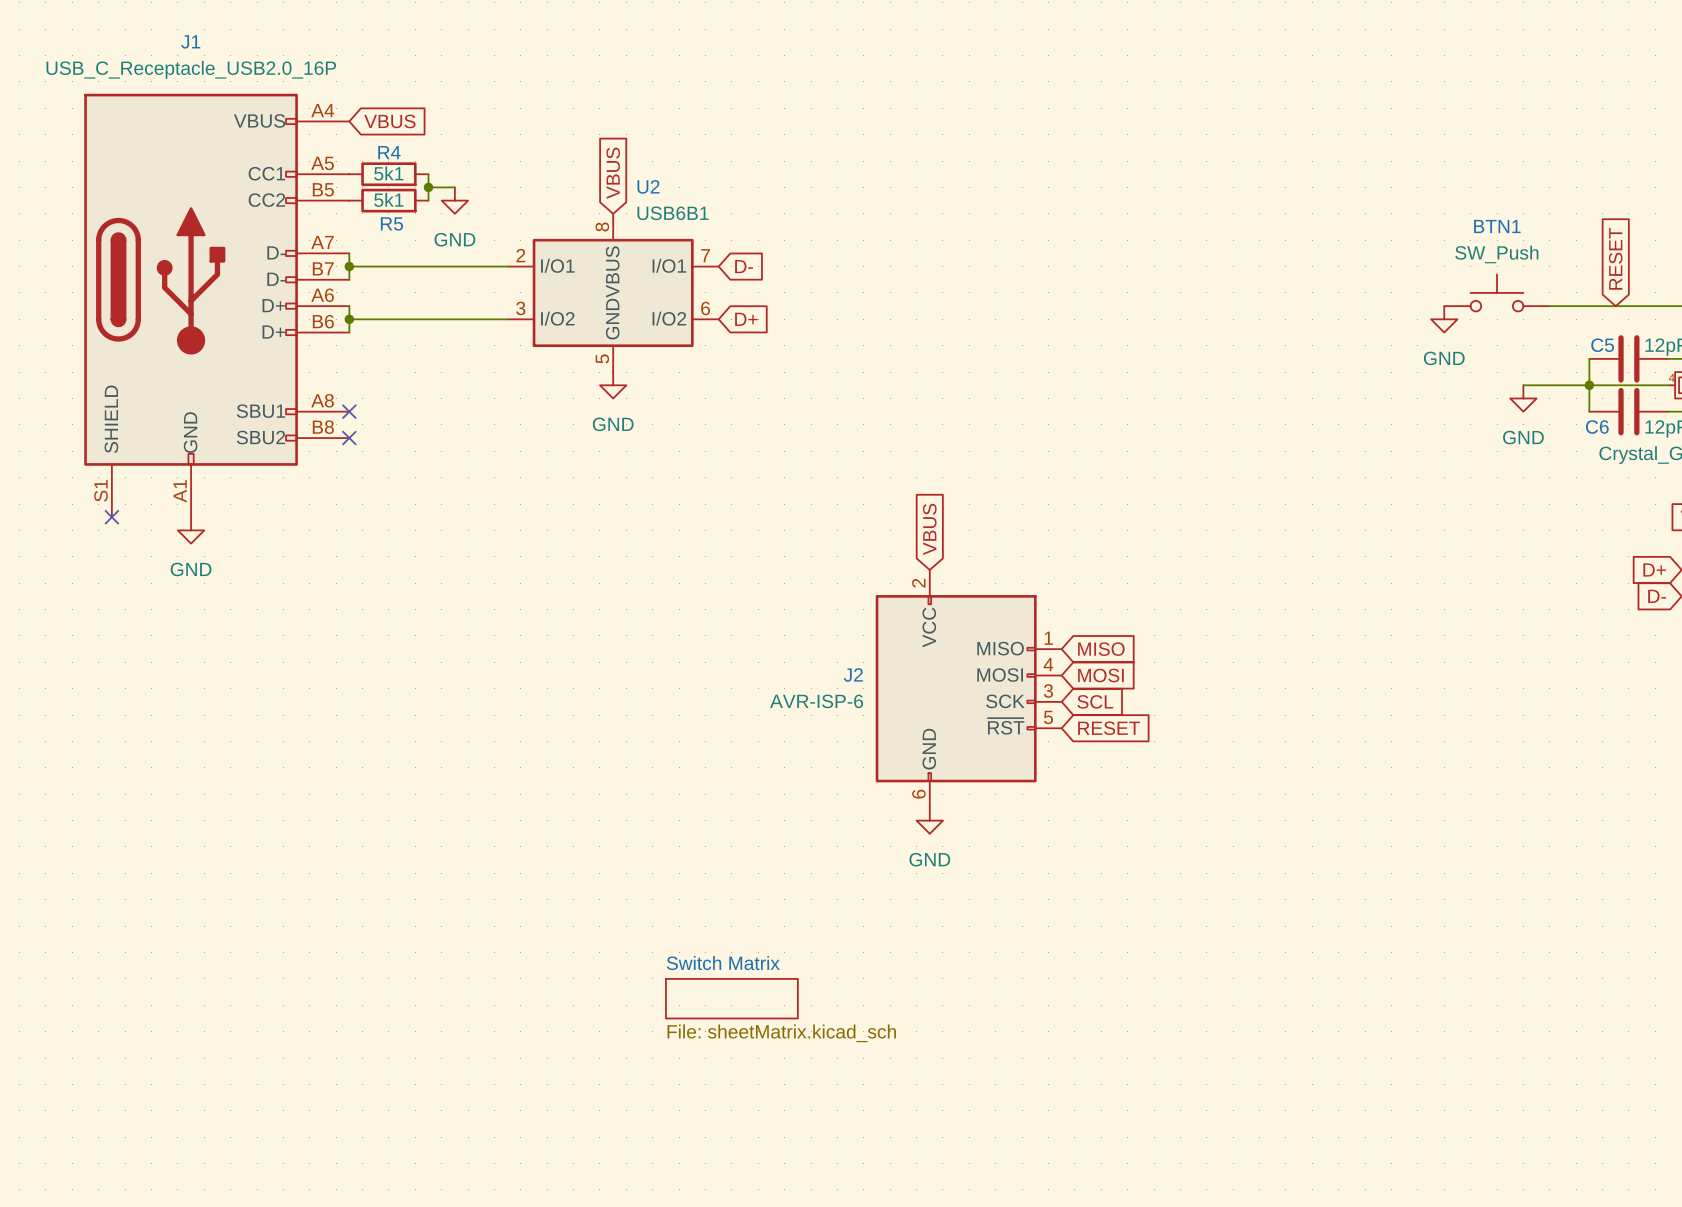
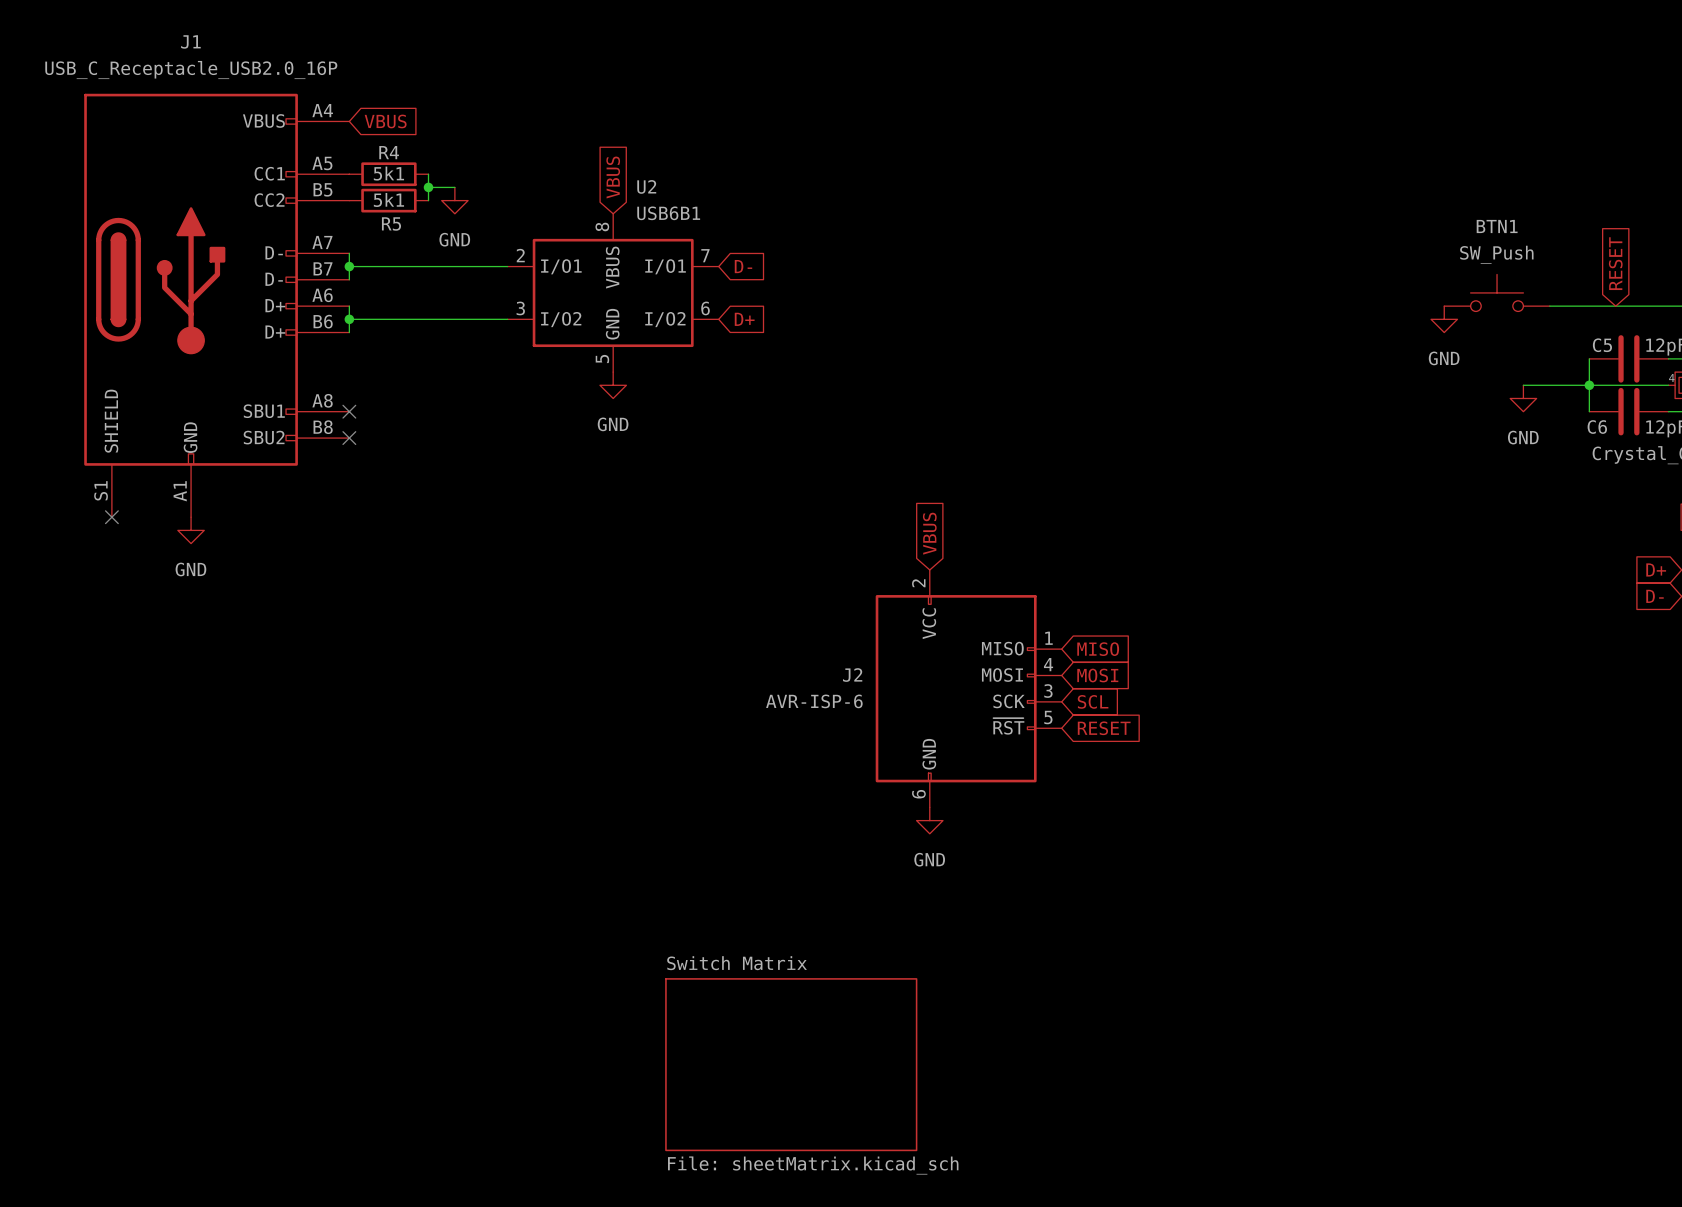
sheet Switch Matrix: File: sheetMatrix.kicad_sch (731, 998) -> none
sheet Switch Matrix: none -> File: sheetMatrix.kicad_sch (791, 1064)

